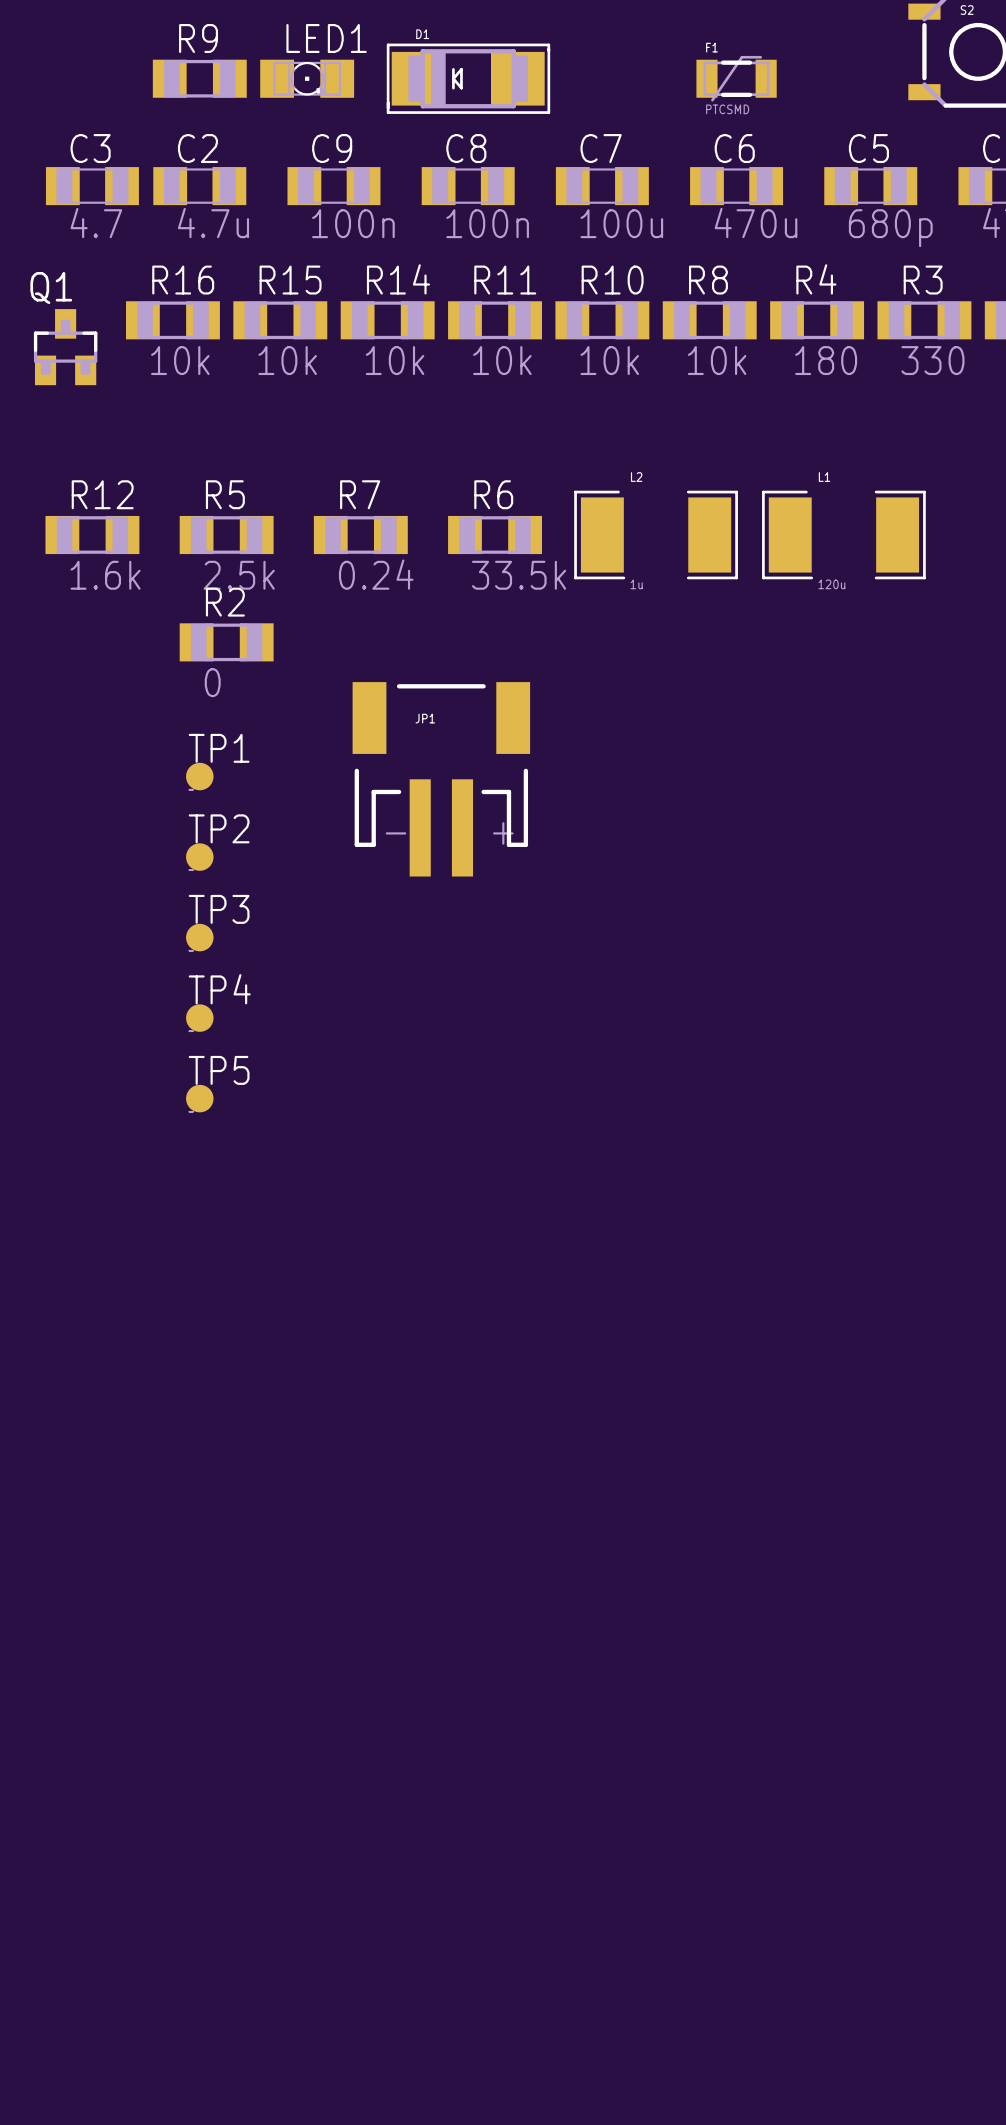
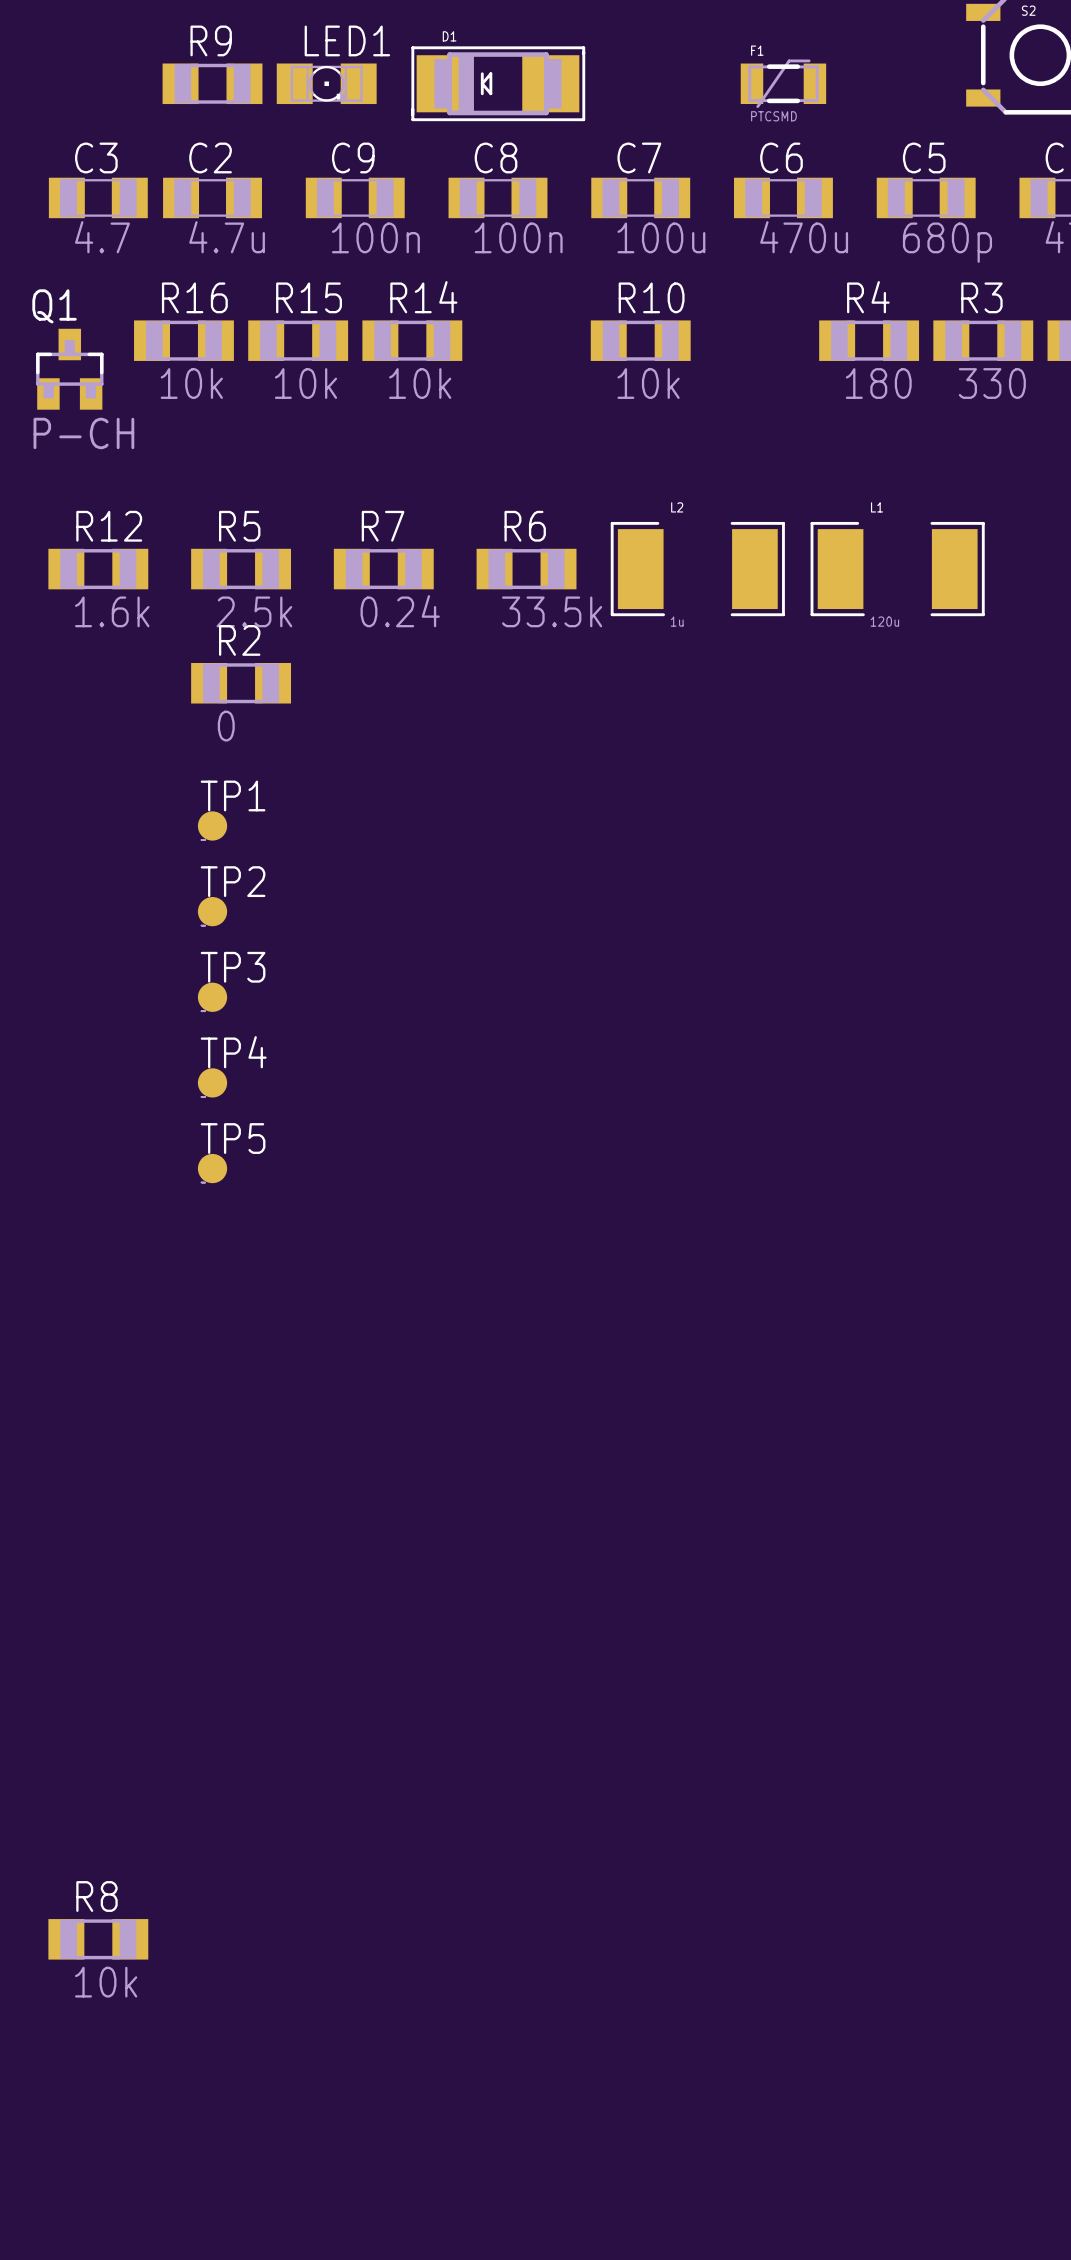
R11: 10k (495, 320) -> none
R8 position: (709, 320) -> (98, 1939)
Q1 value: none -> P-CH (83, 433)
JP1: (441, 779) -> none

